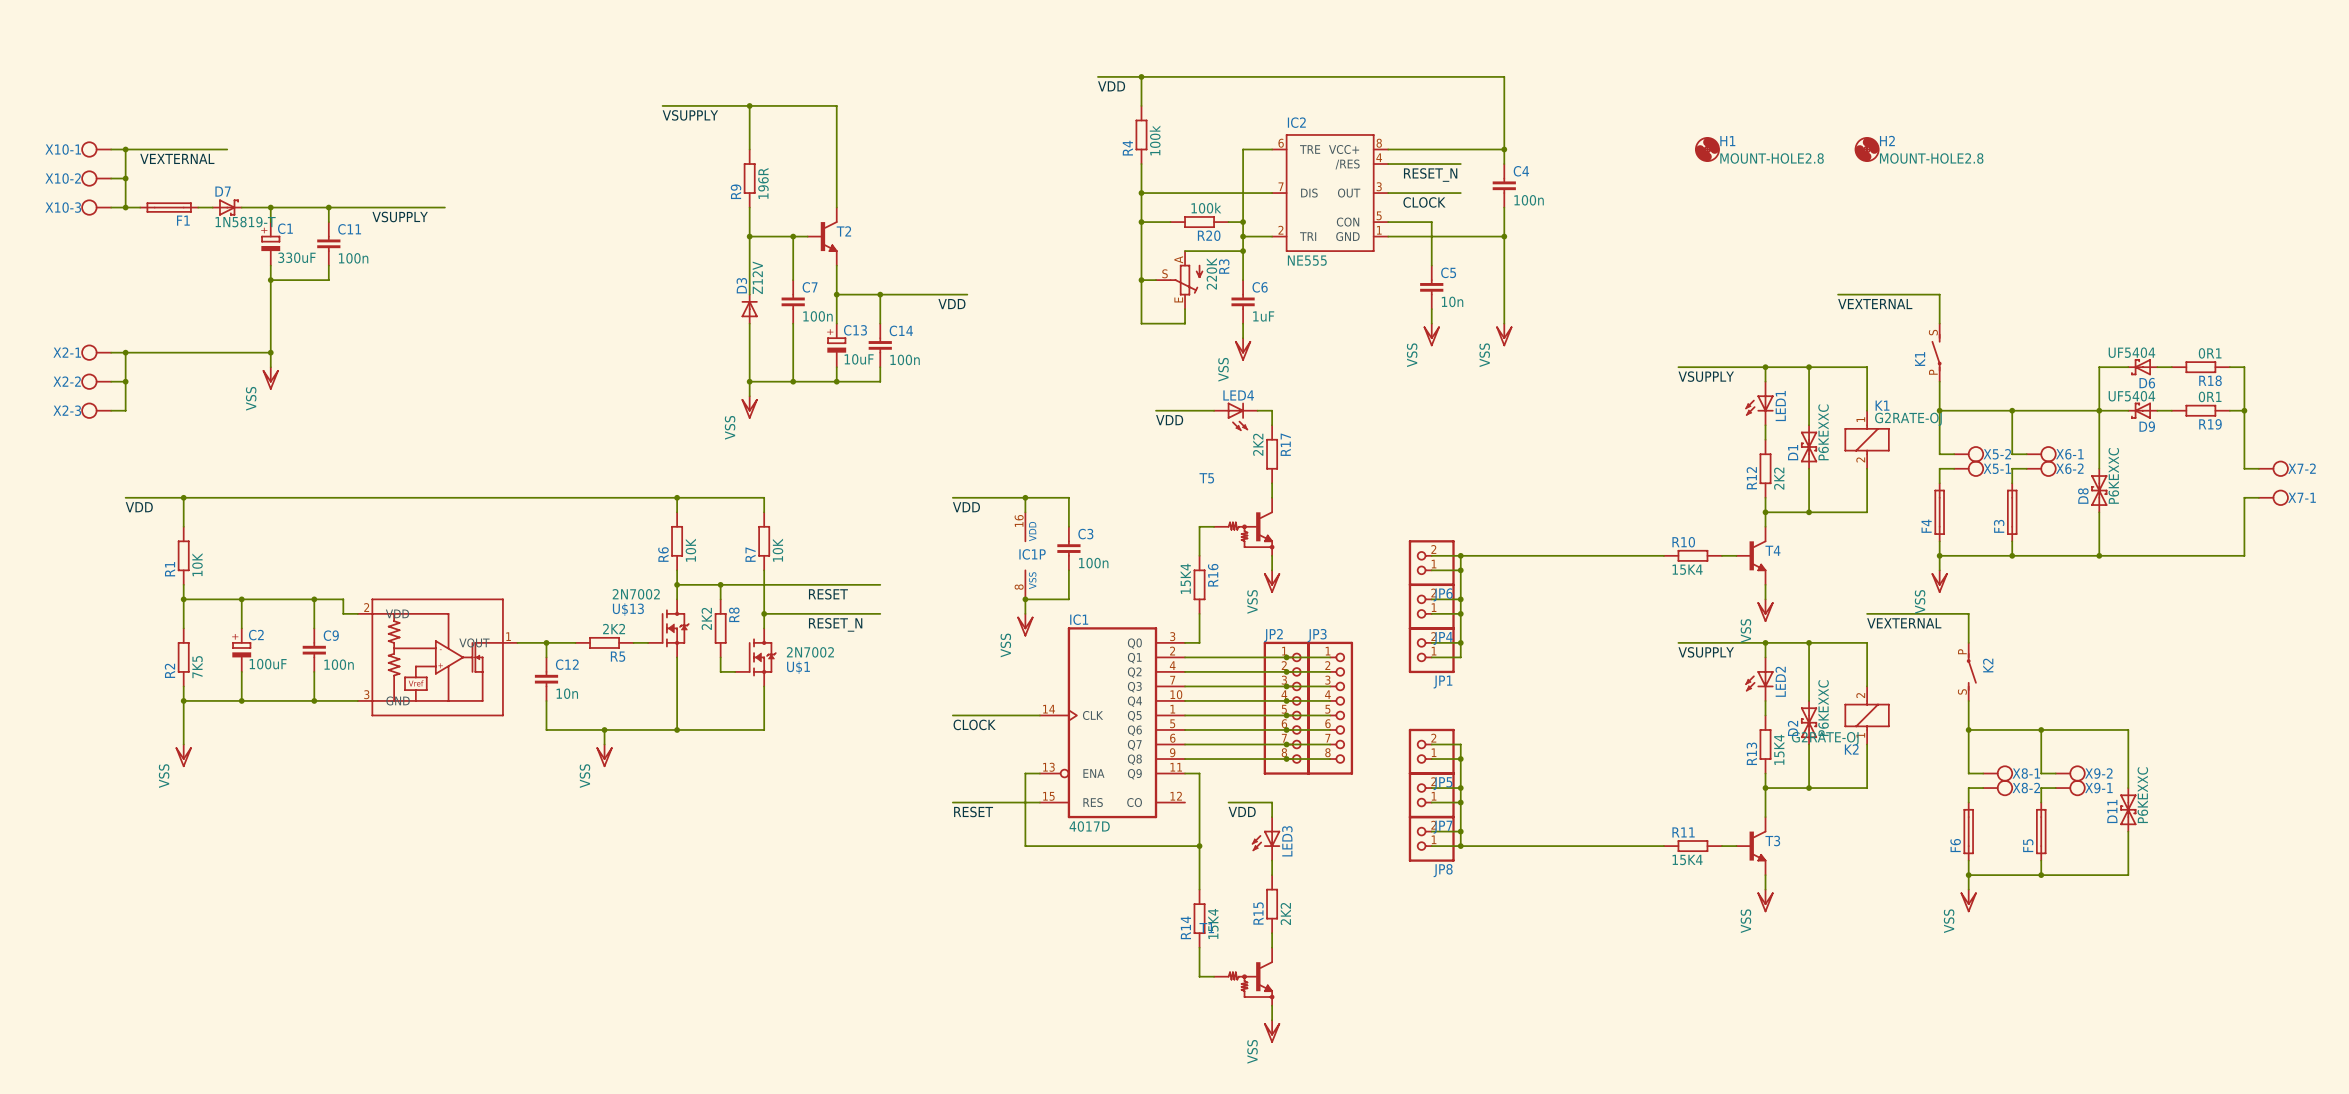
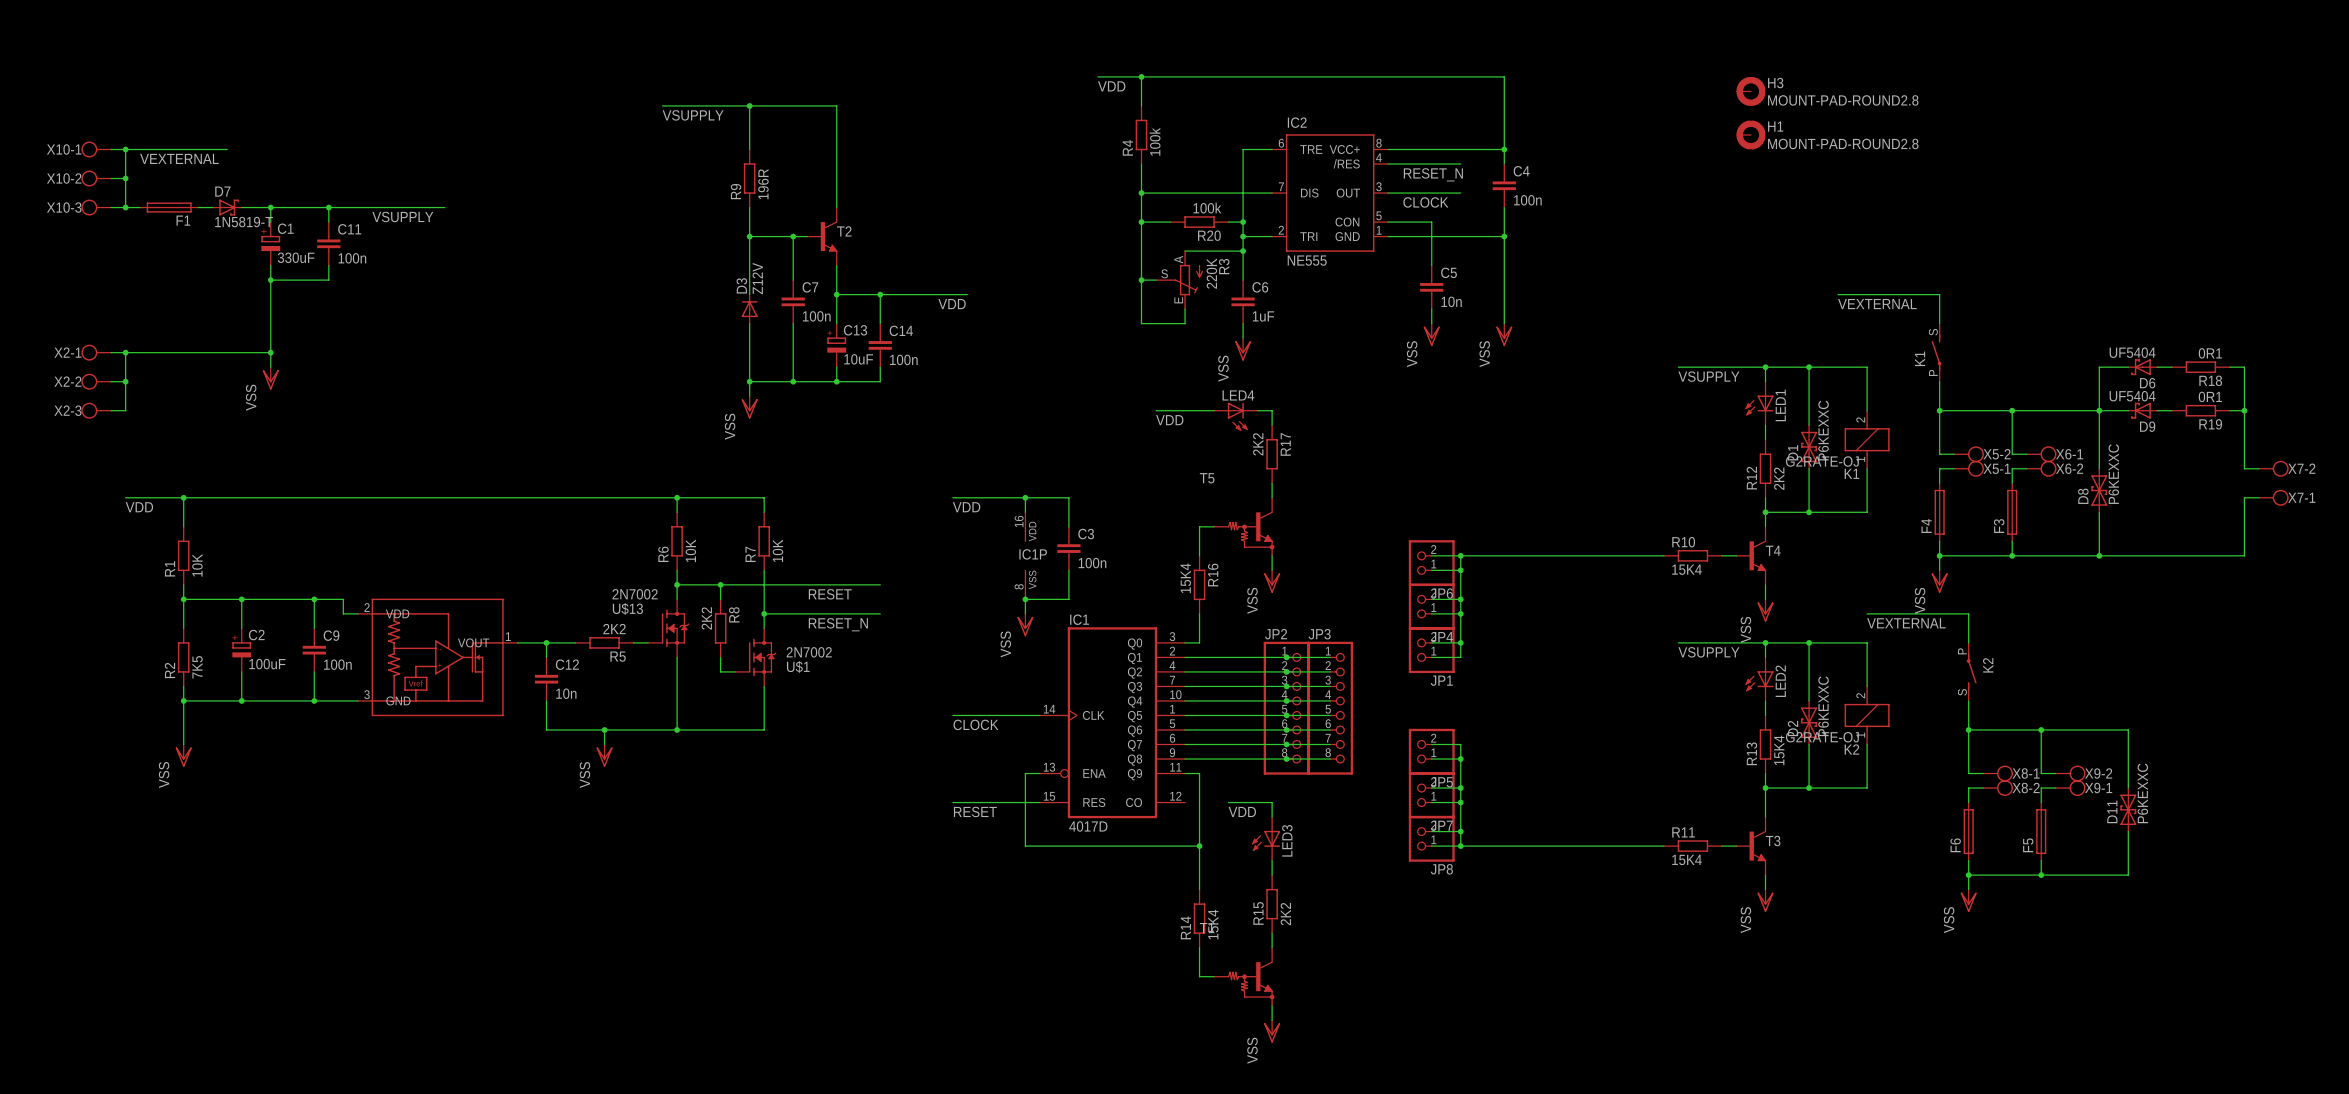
H3: none -> MOUNT-PAD-ROUND2.8 (1751, 91)
H1 symbol: [1695, 137, 1720, 162] -> [1736, 120, 1766, 150]
H2: MOUNT-HOLE2.8 (1867, 149) -> none
H1 value: MOUNT-HOLE2.8 (1772, 158) -> MOUNT-PAD-ROUND2.8 (1843, 143)
K1 rotation: 0° (1867, 439) -> 180° (1867, 439)

